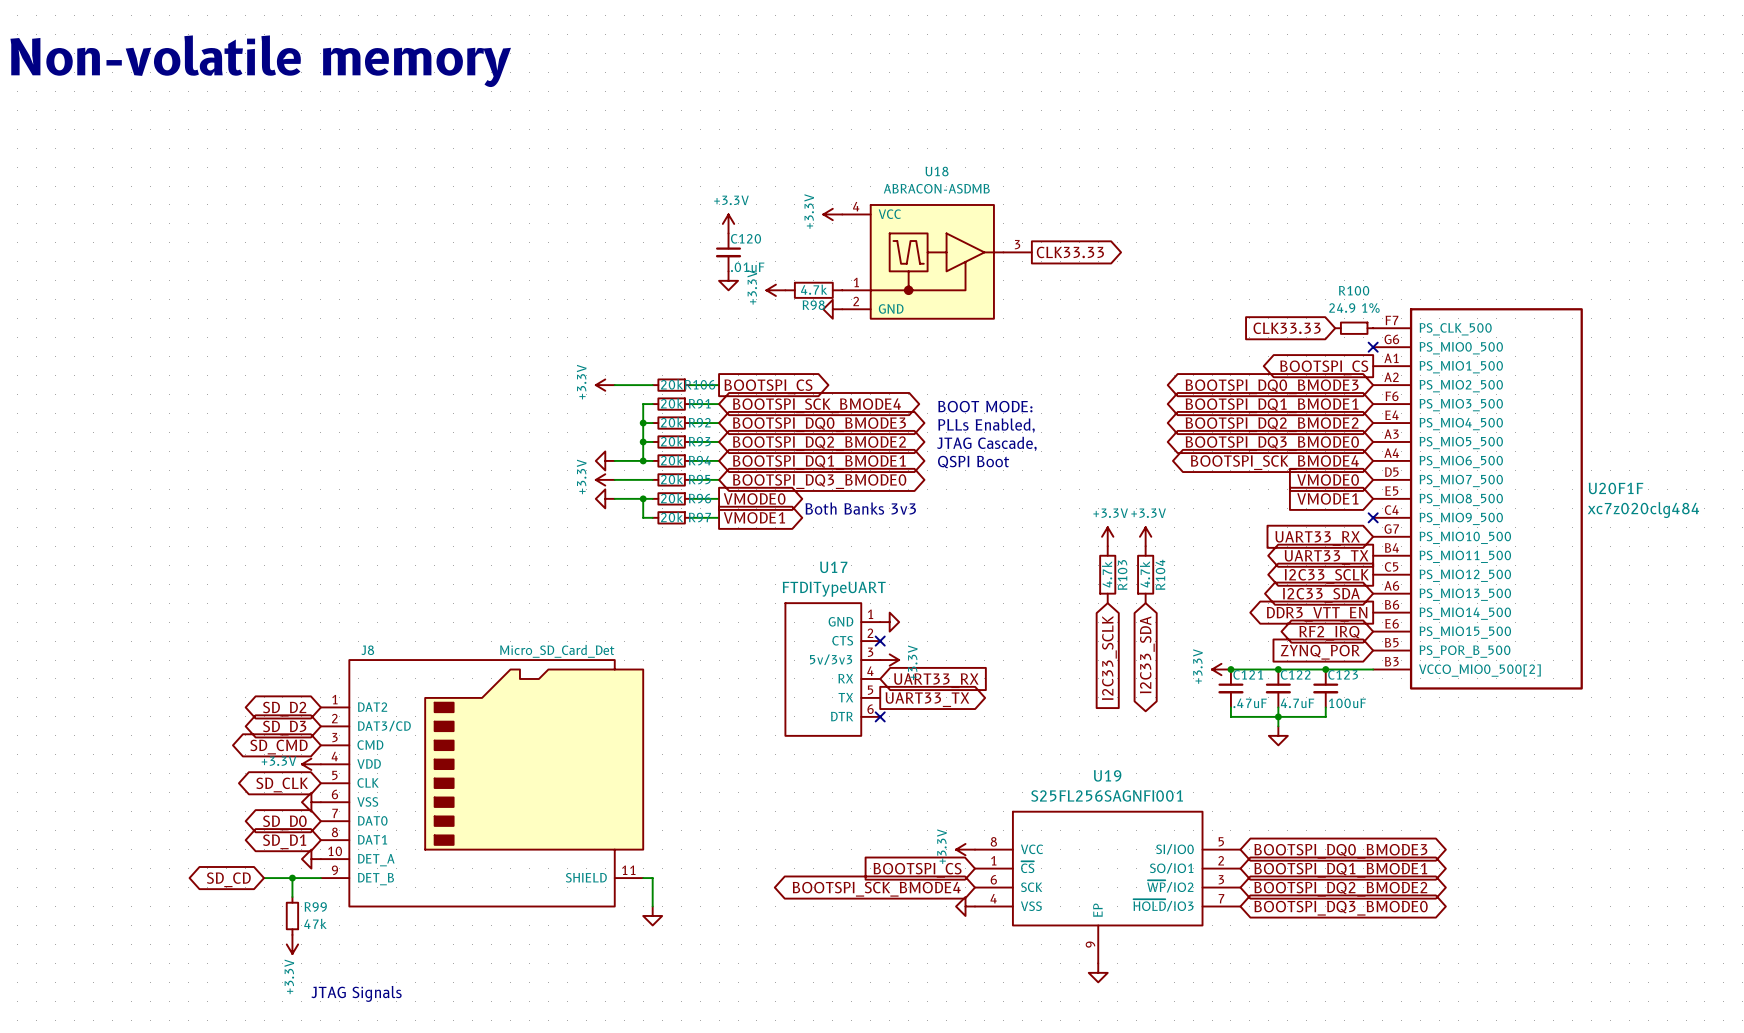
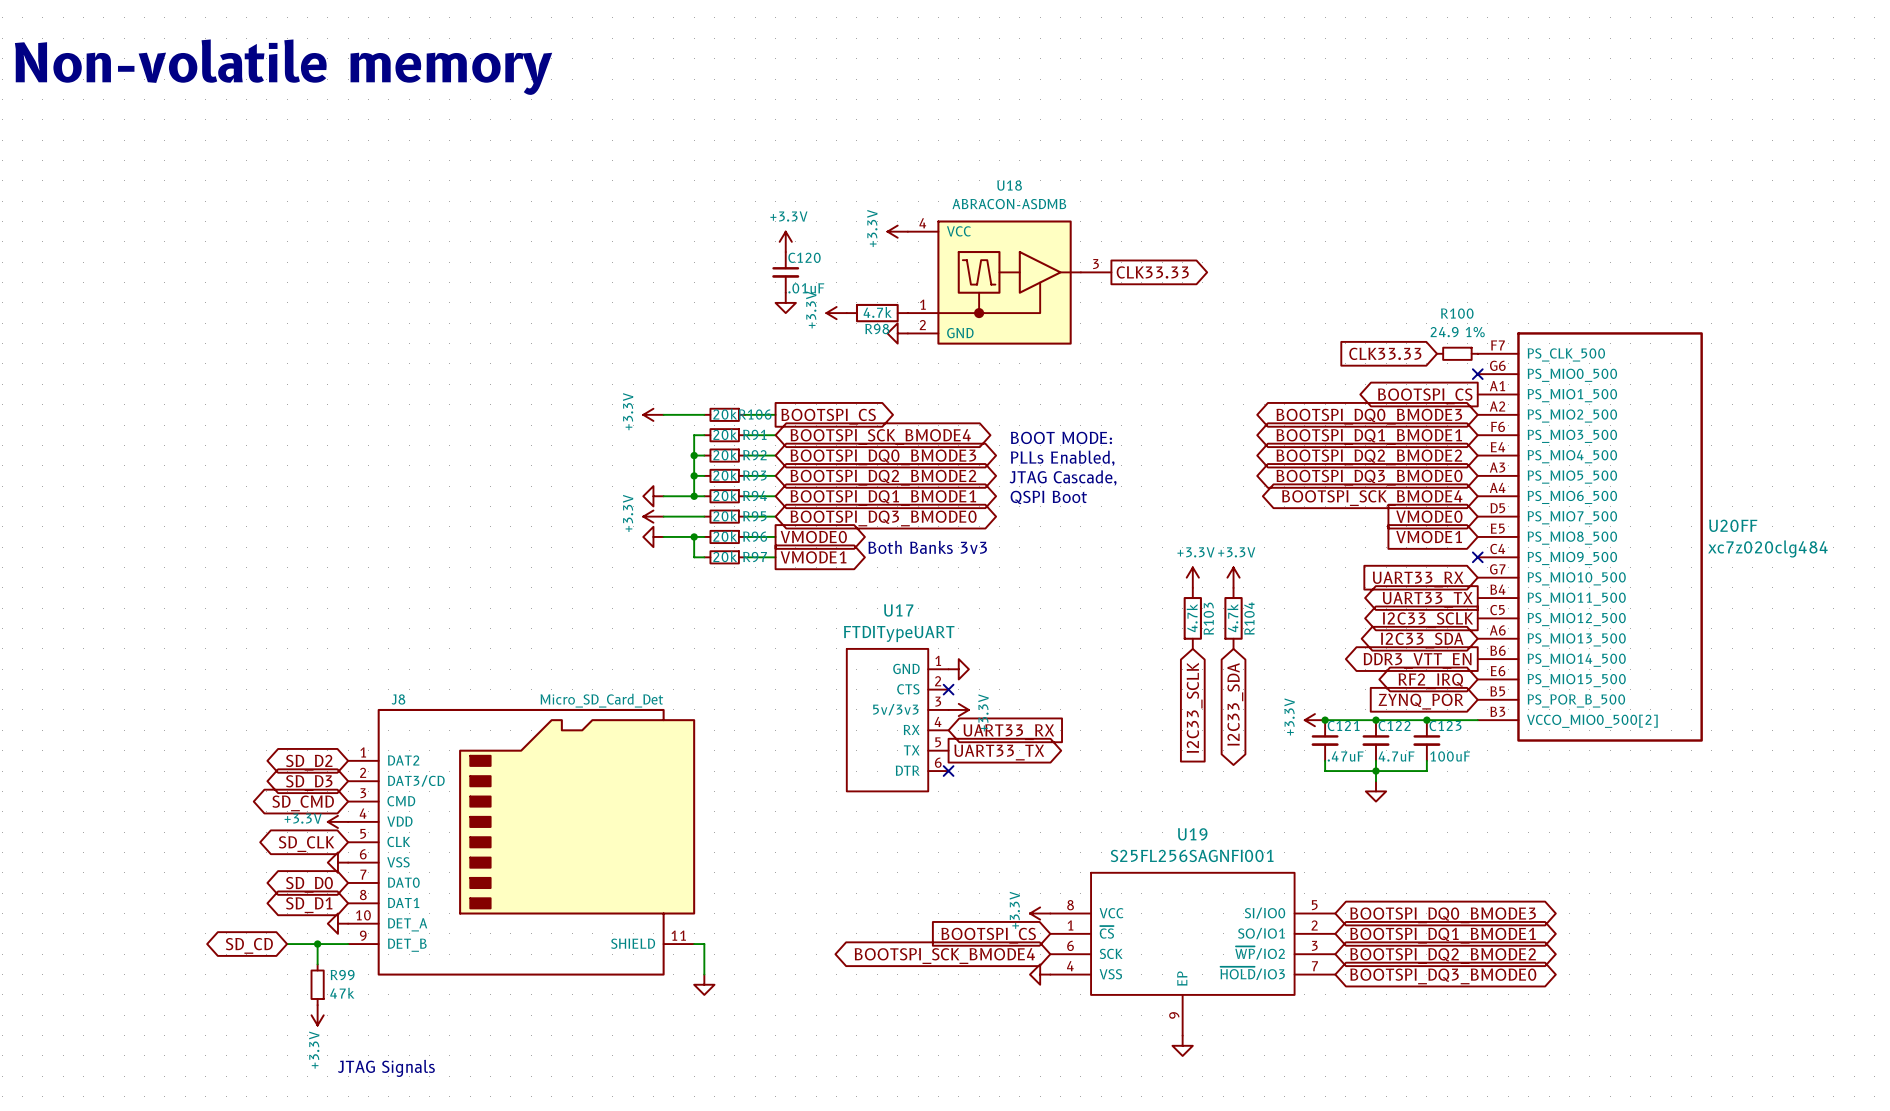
U20F1F name: U20F1F (1616, 488) -> U20FF (1733, 525)

